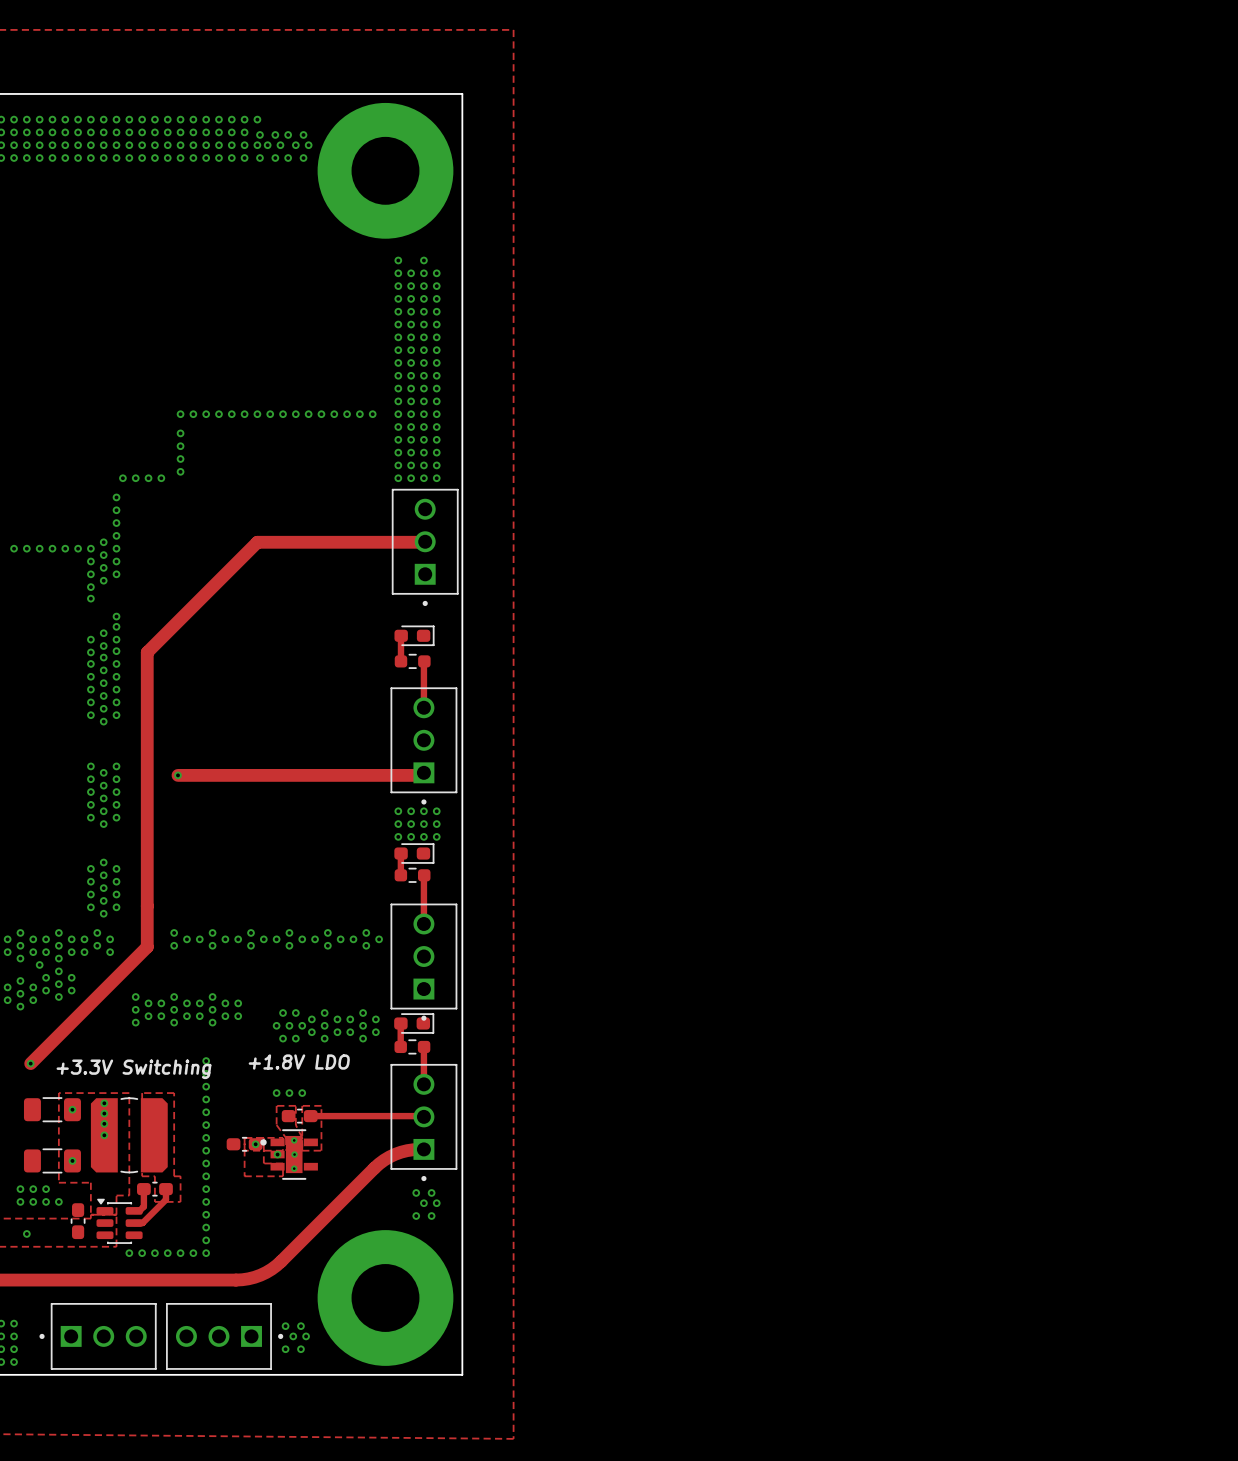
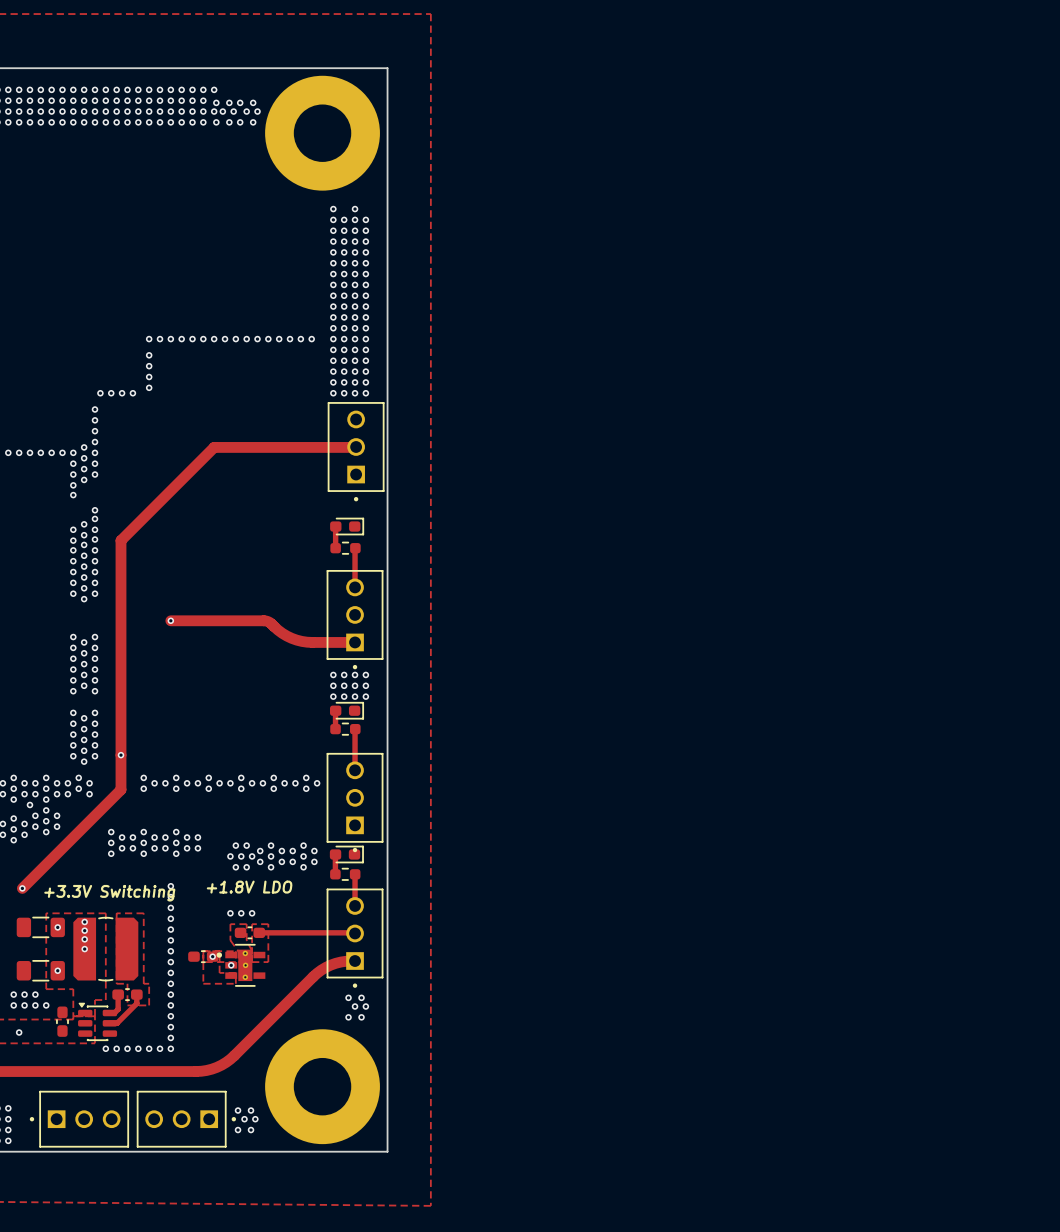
track: (423, 772) (421, 775) (177, 775) -> (355, 642) (301, 641) (286, 636) (264, 620) (170, 620)
via position: (177, 775) -> (170, 620)
via: none -> (73, 691)
via: none -> (94, 691)
via: none -> (73, 712)
via: none -> (94, 712)
via: none -> (120, 755)

